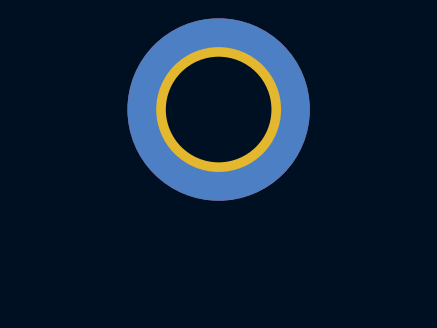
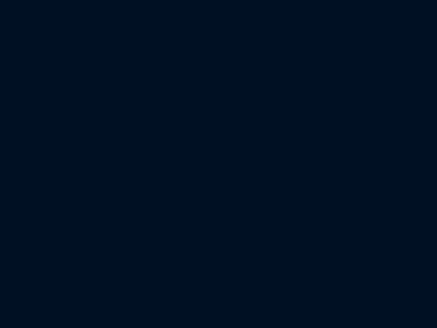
part: (218, 109) -> none

